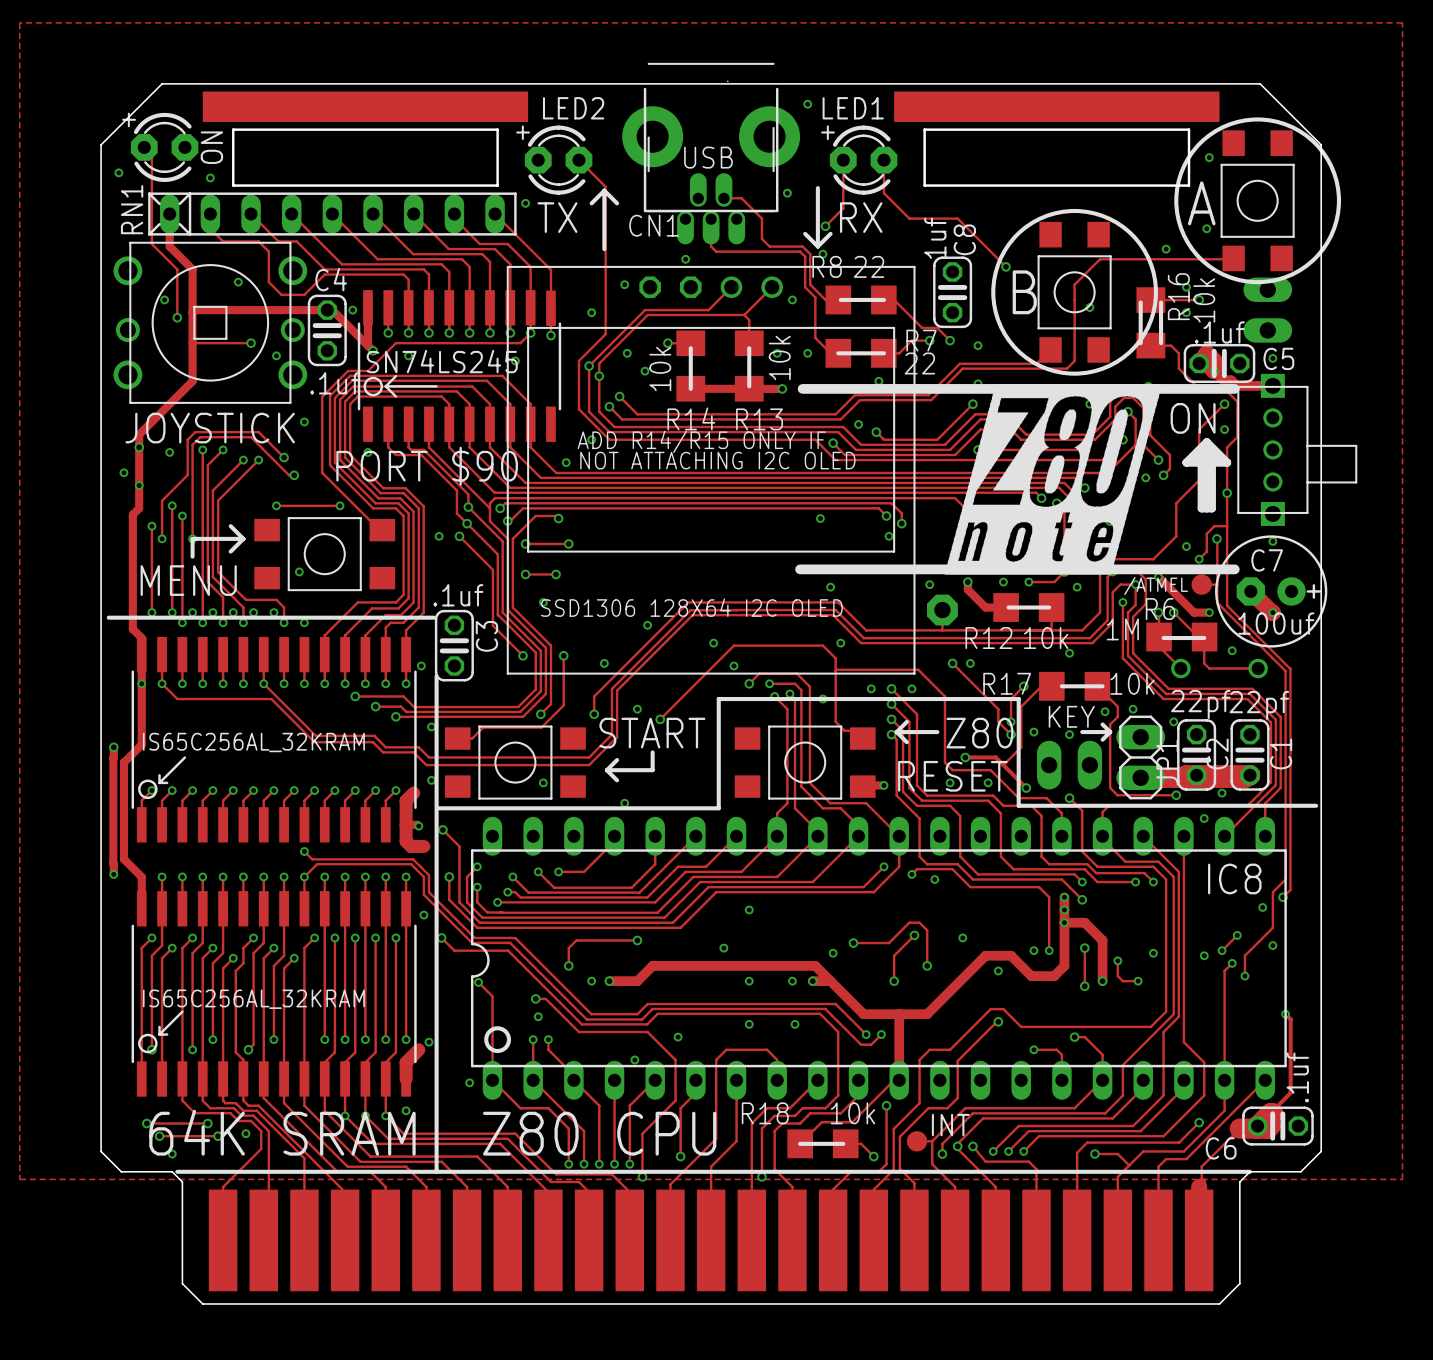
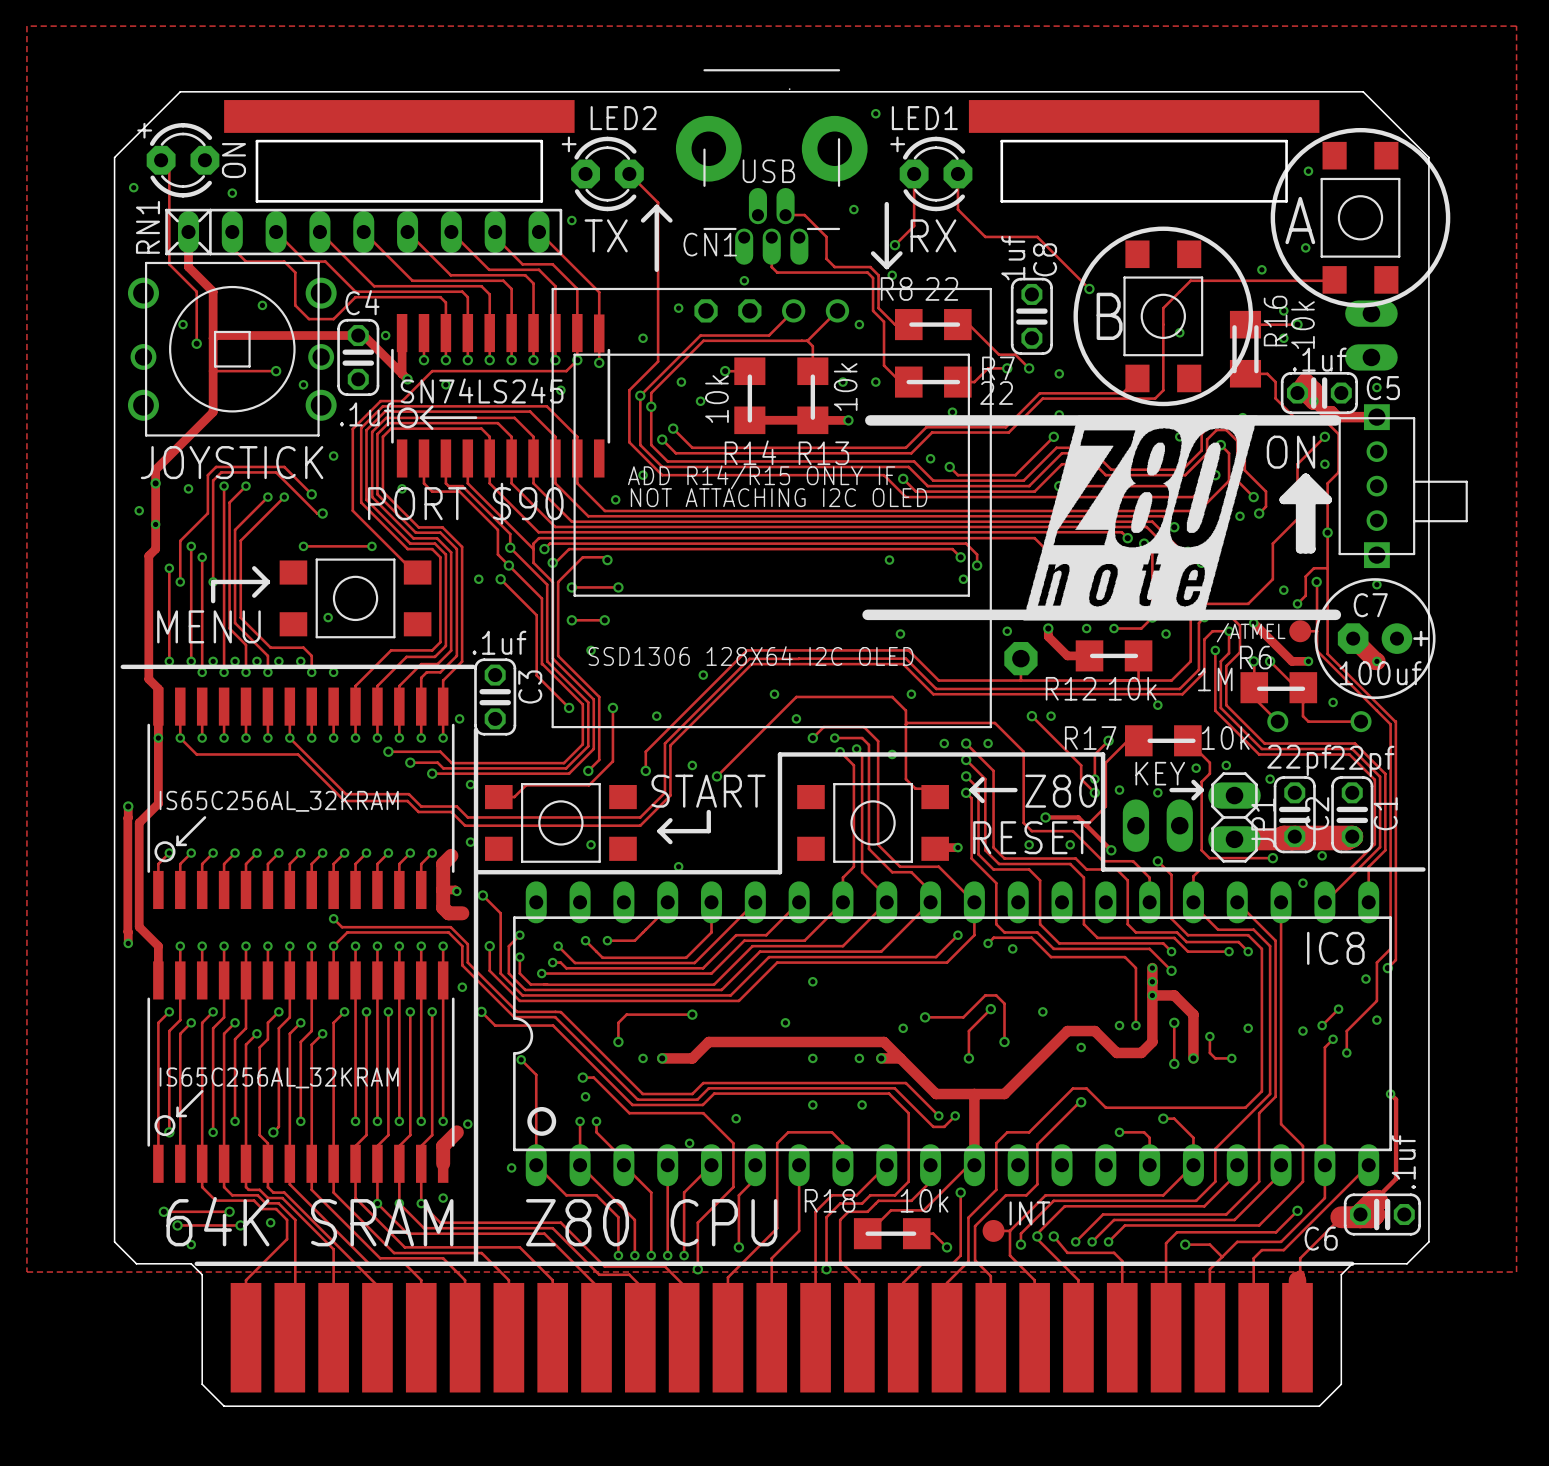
line: (645, 88) (645, 210) (777, 210) (777, 88) -> none

